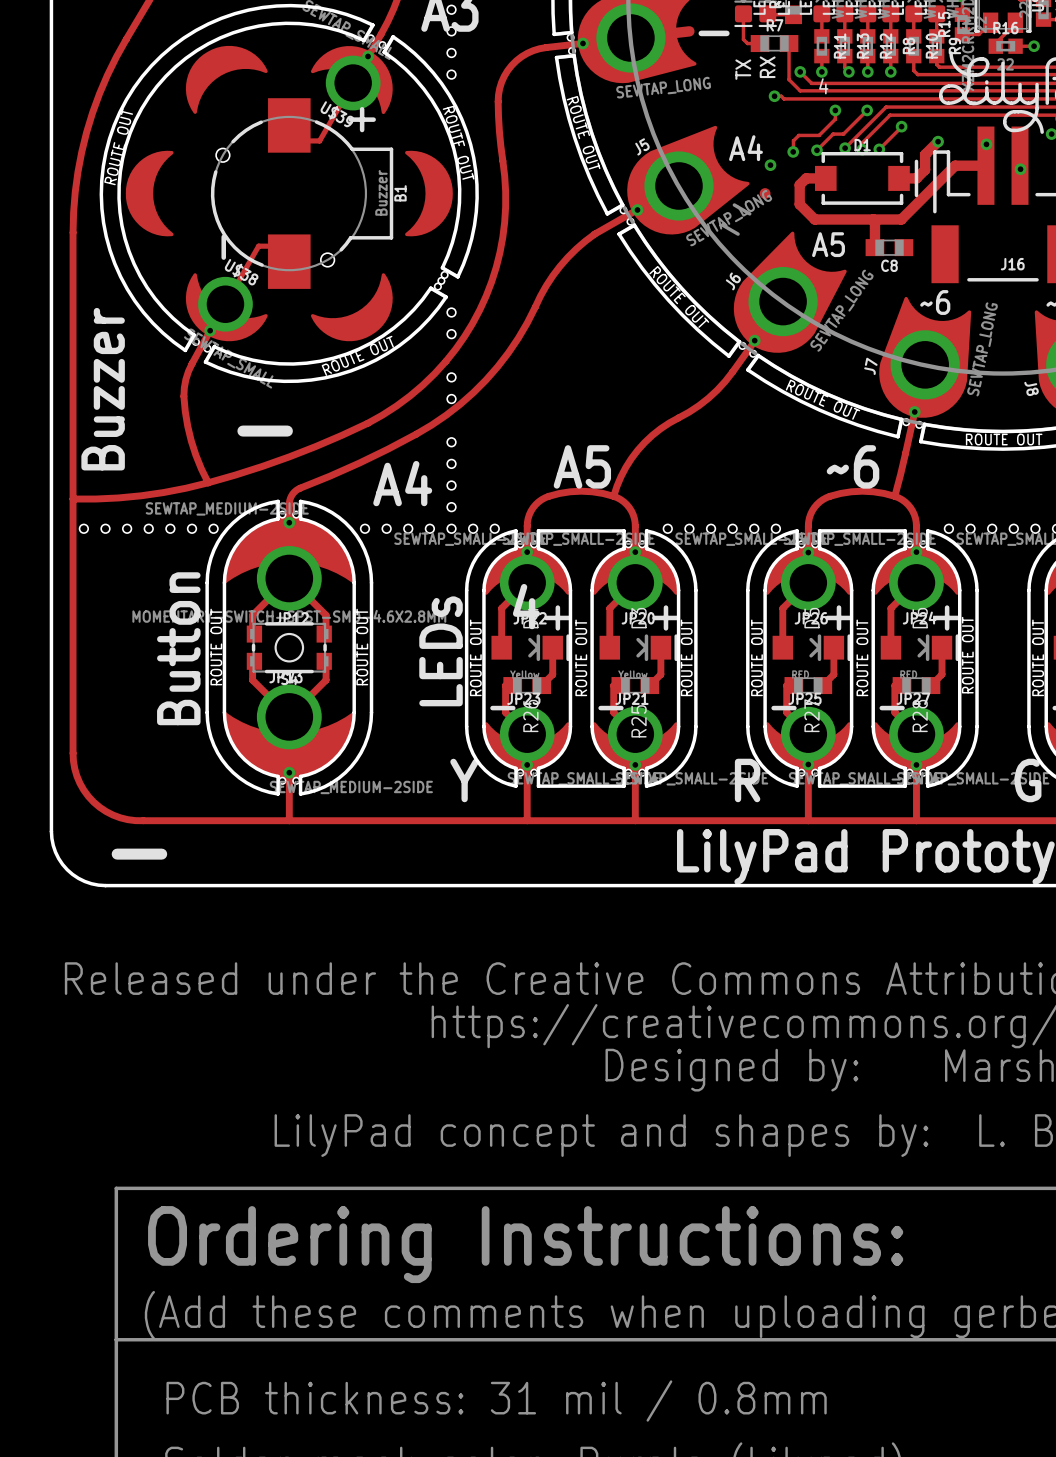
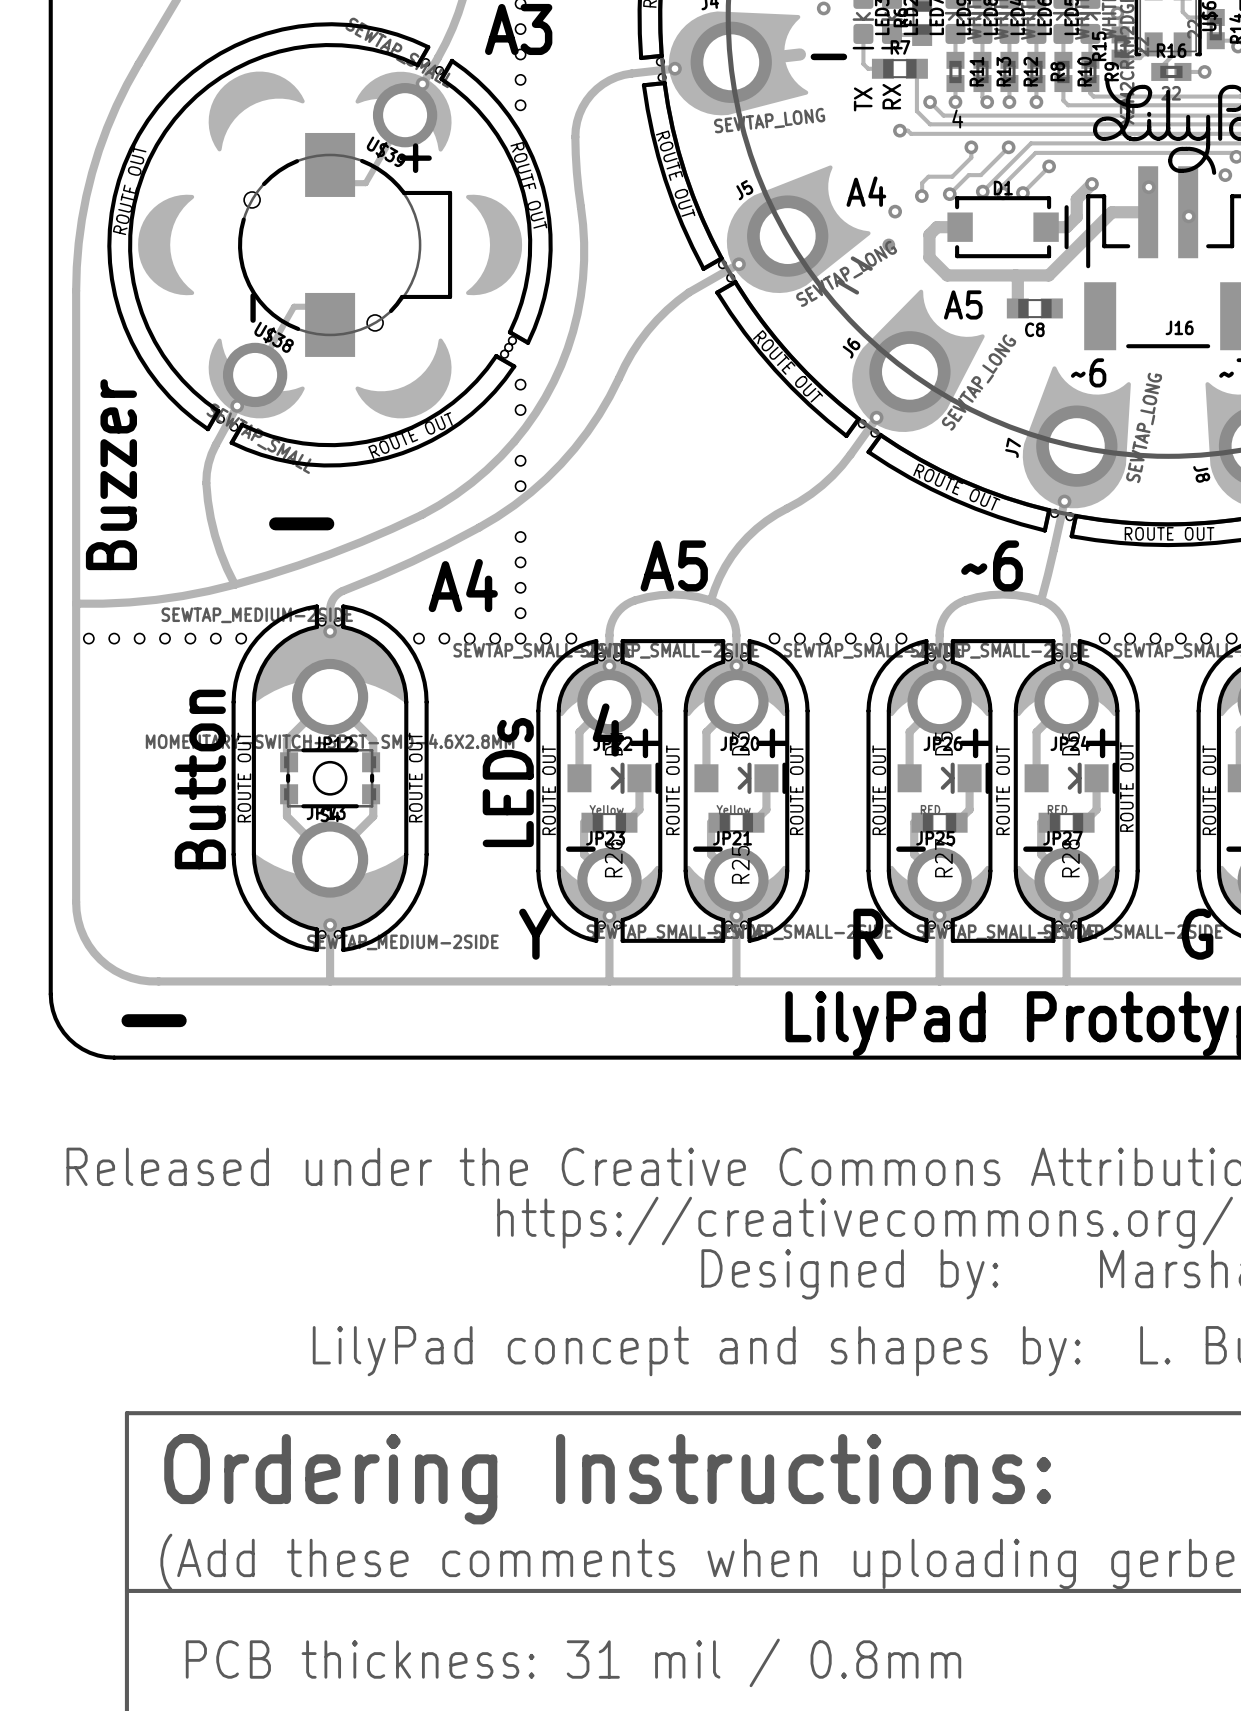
B1 value: Buzzer (381, 192) -> none
B1 name: B1 (400, 193) -> none

